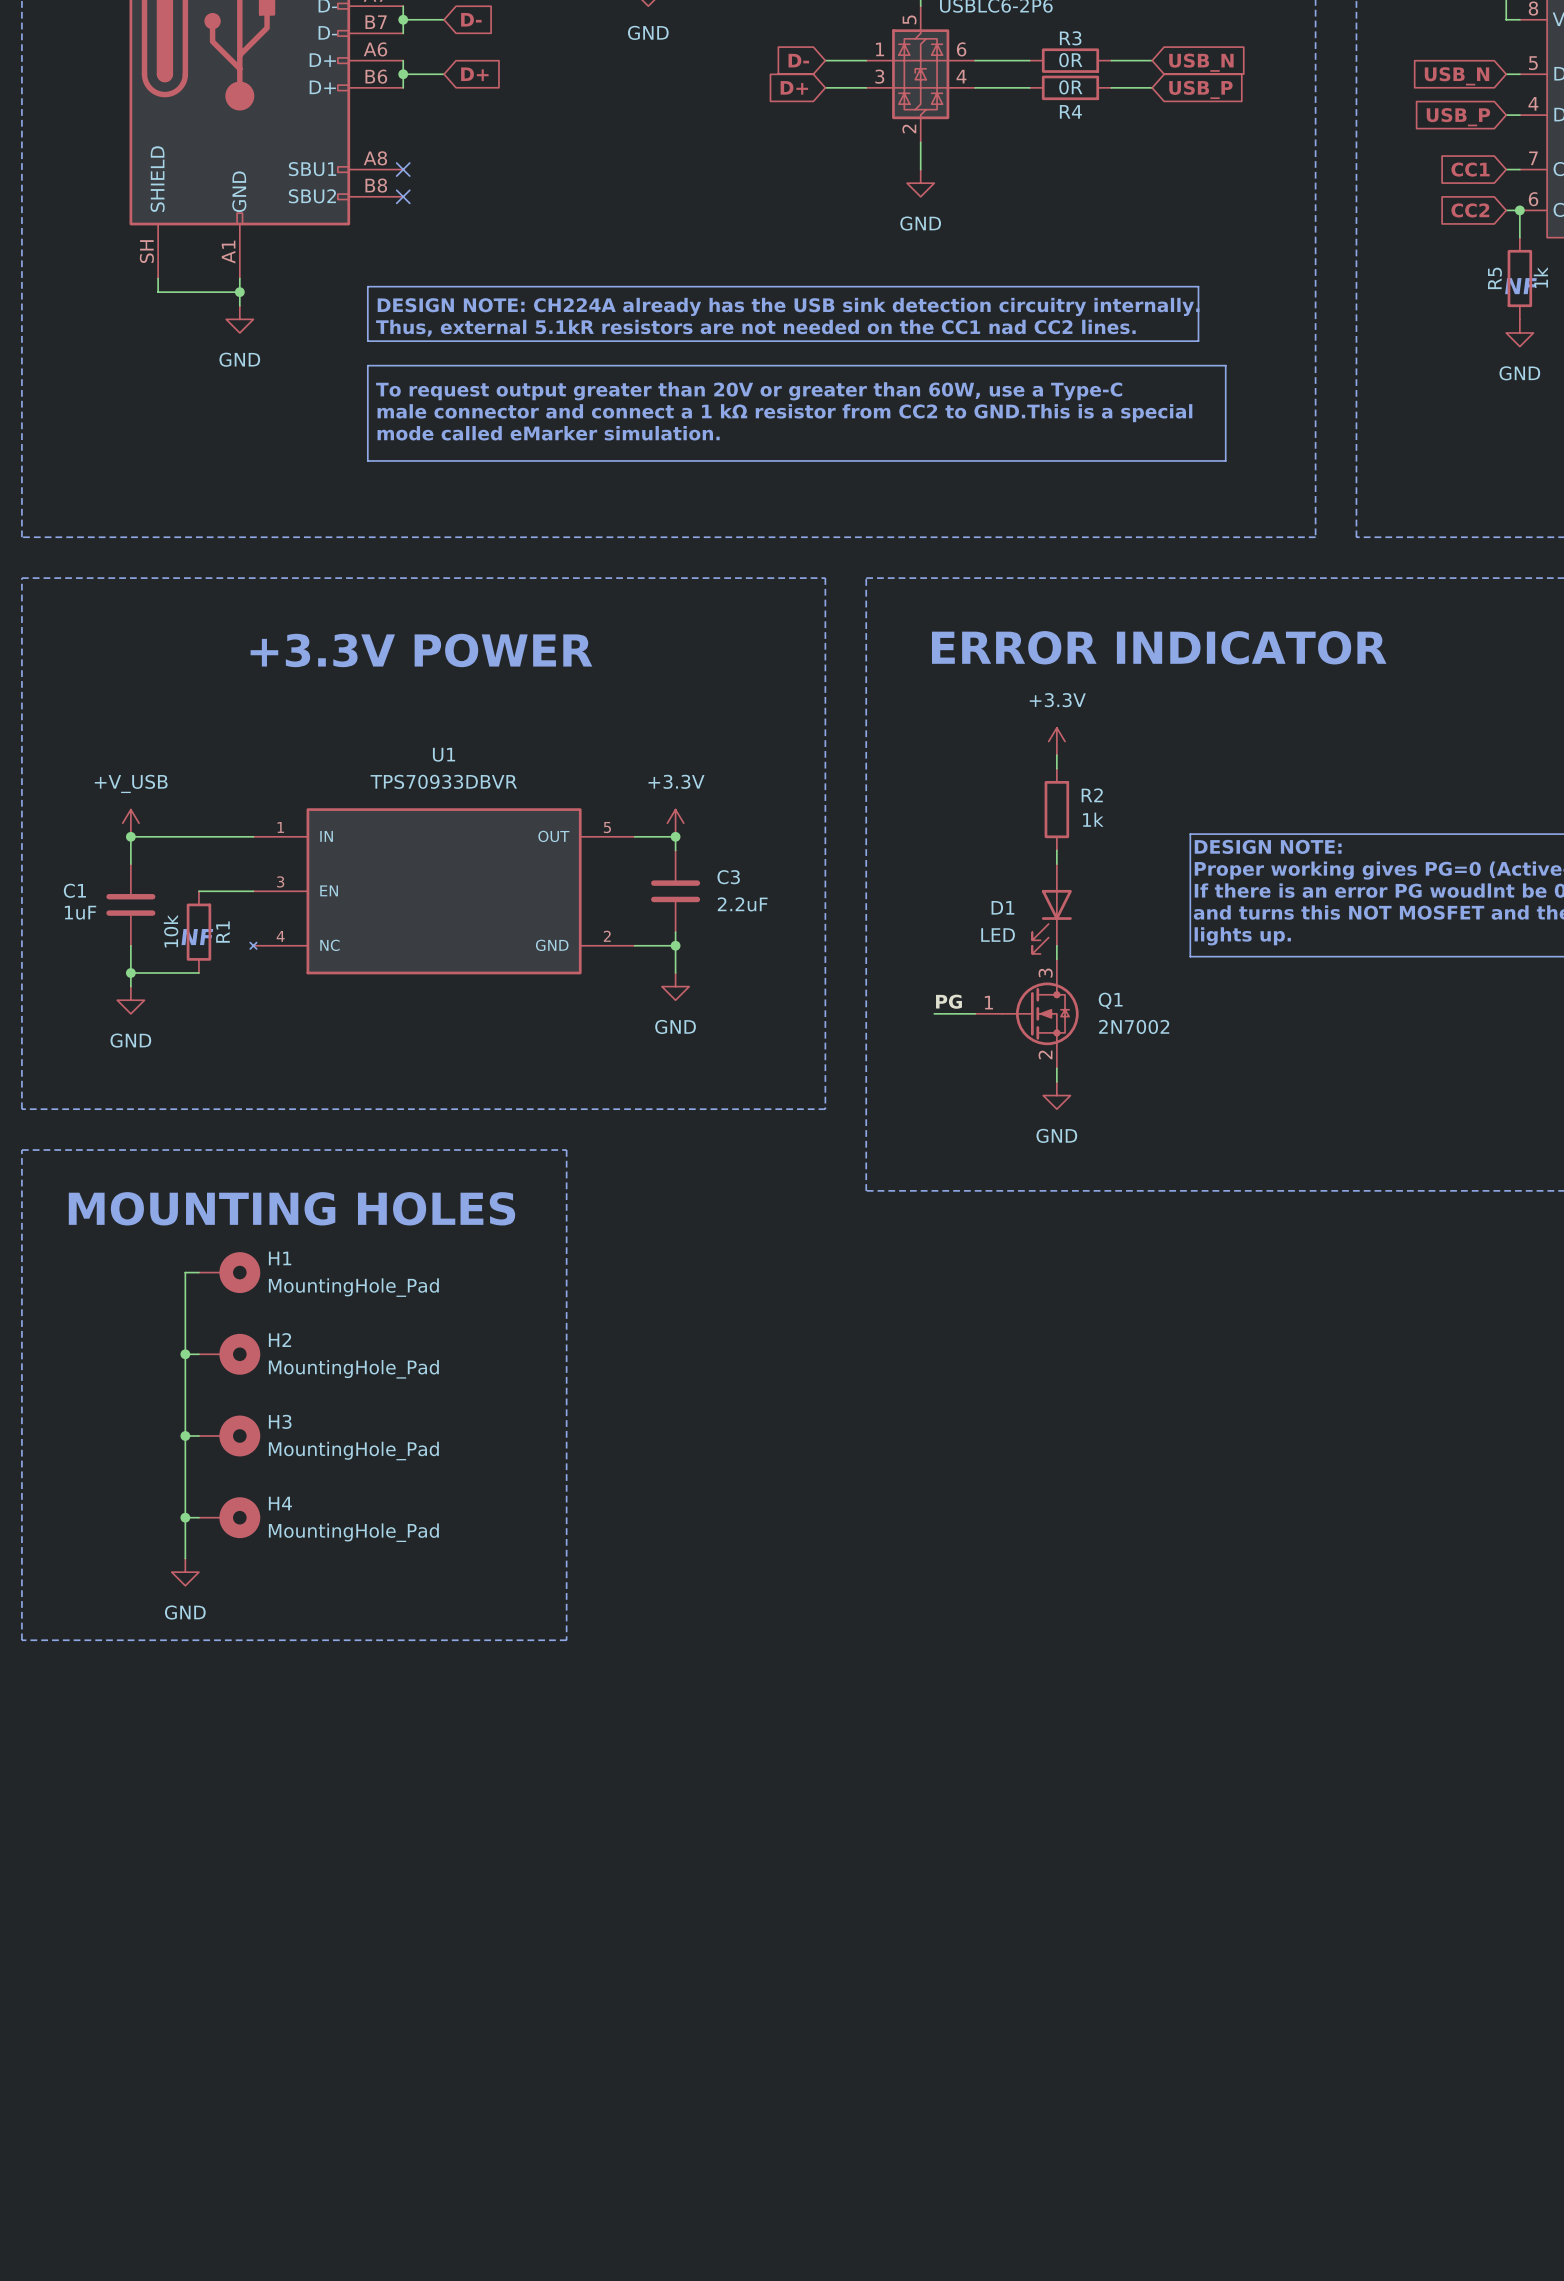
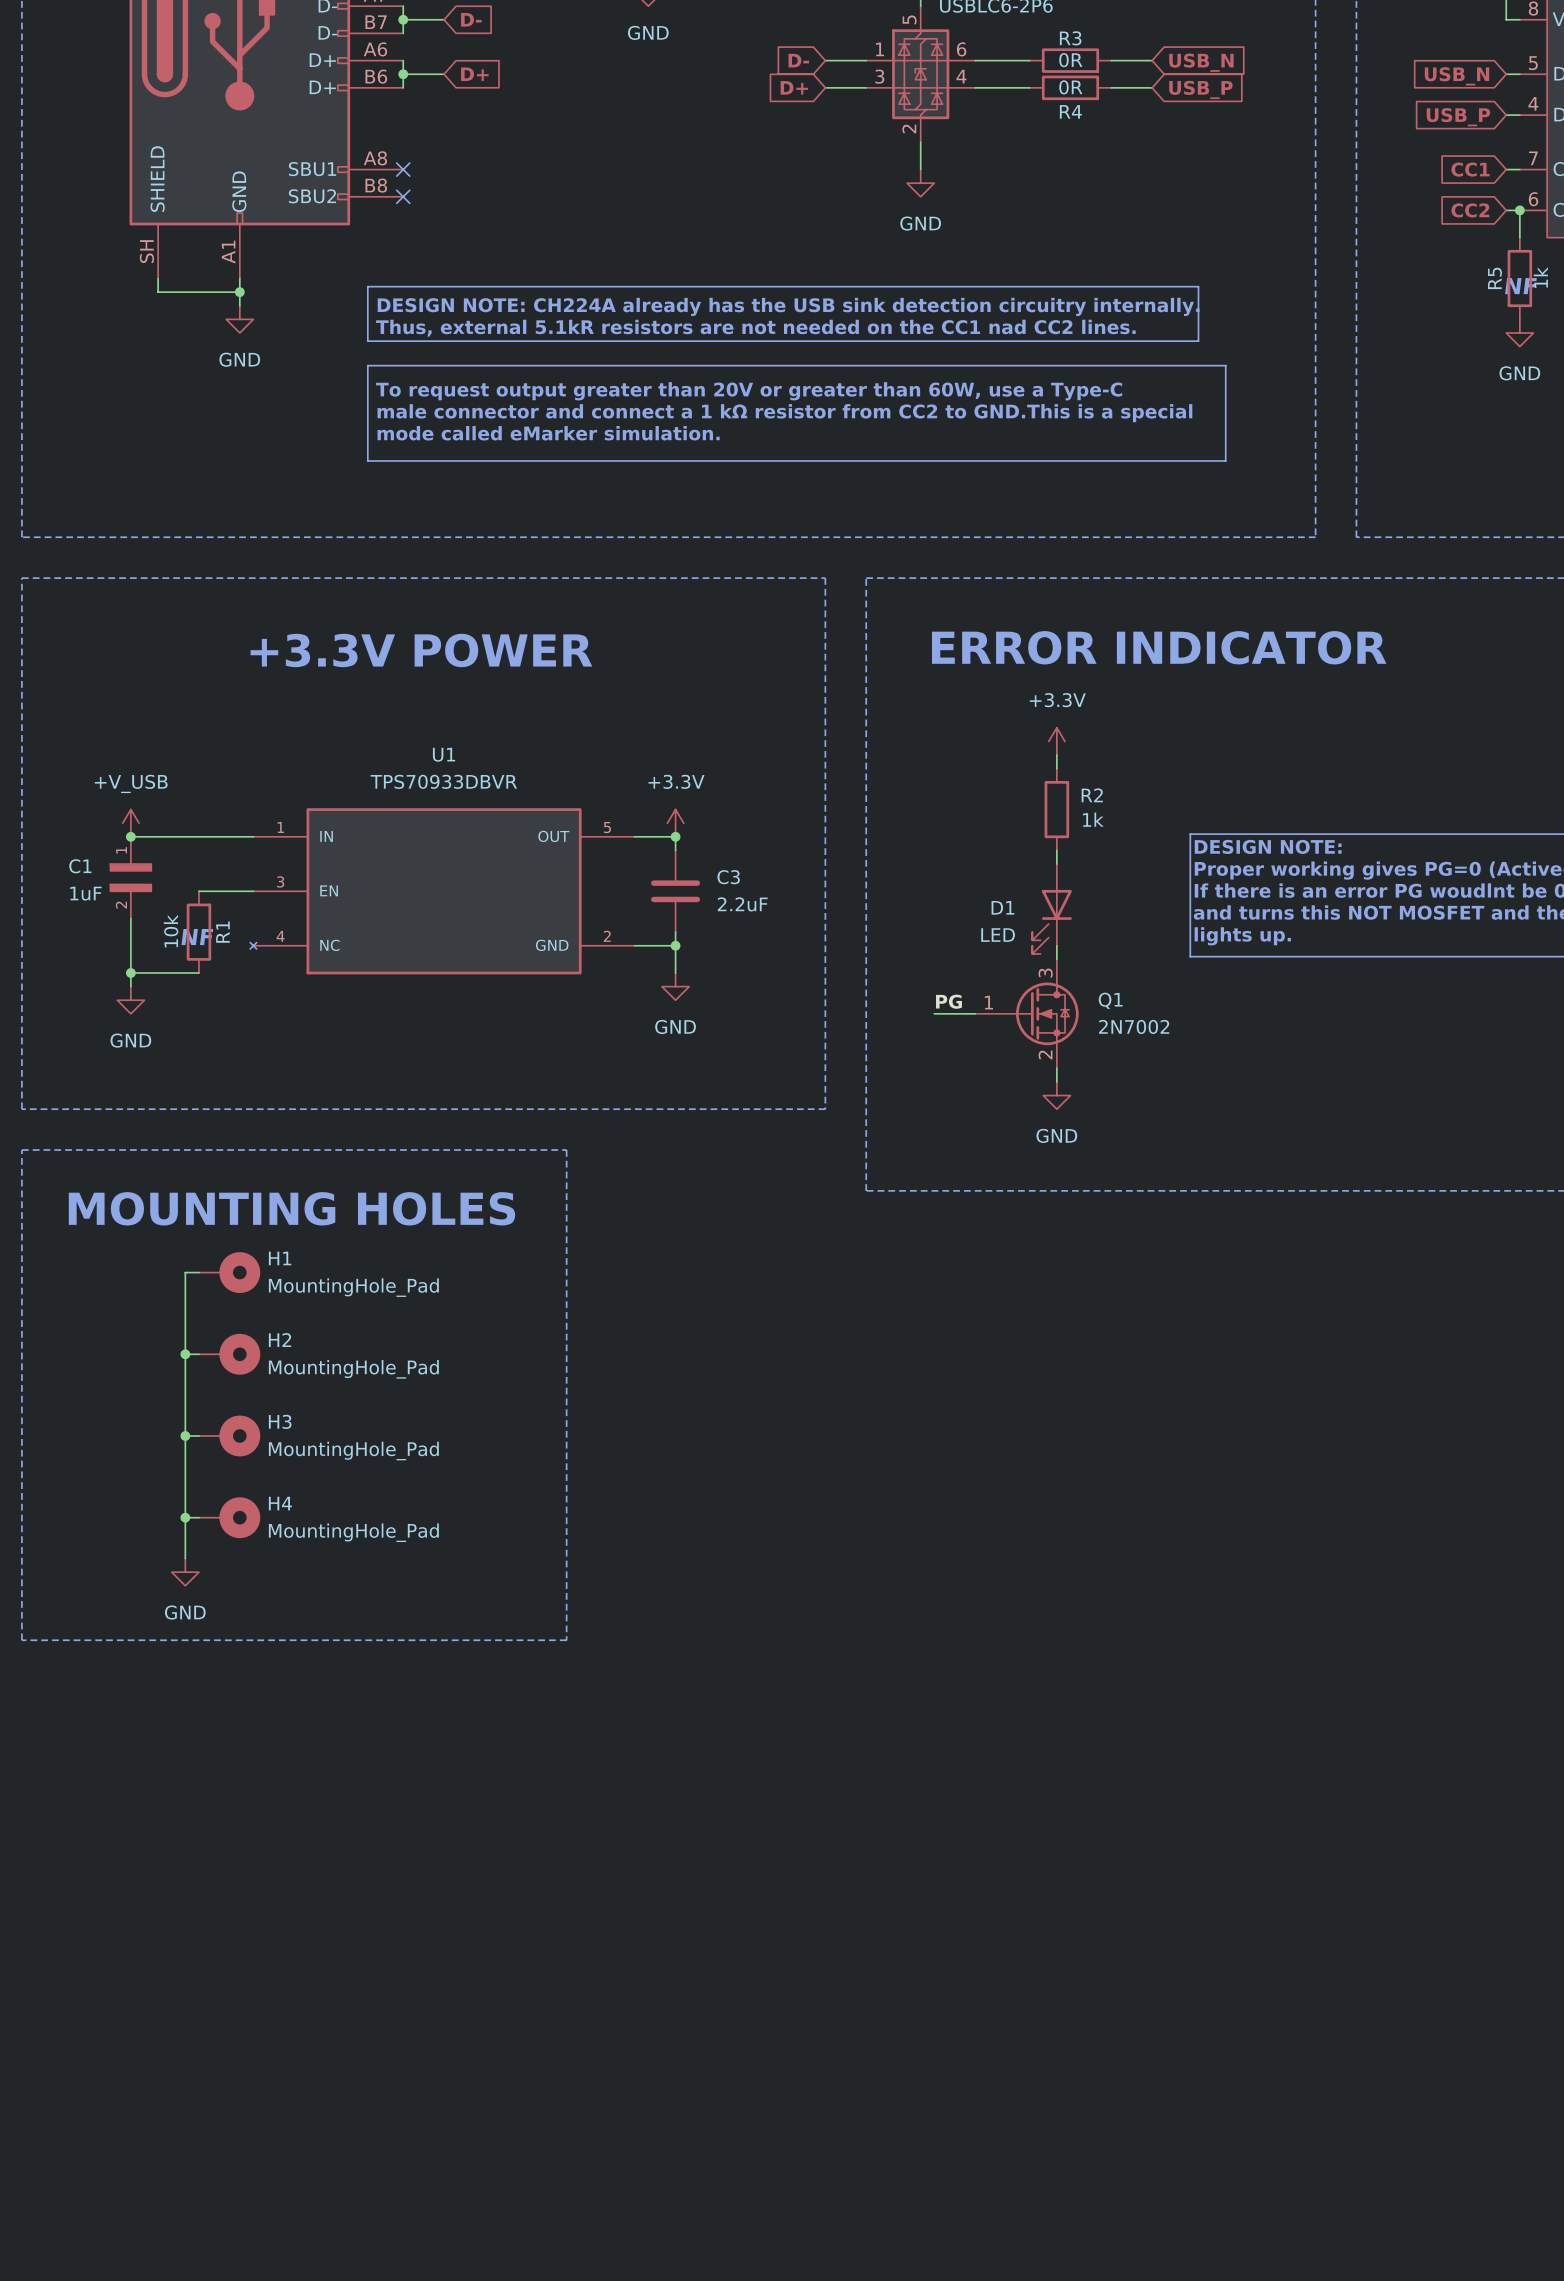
C1 symbol: [106, 864, 156, 946] -> [109, 836, 152, 919]

